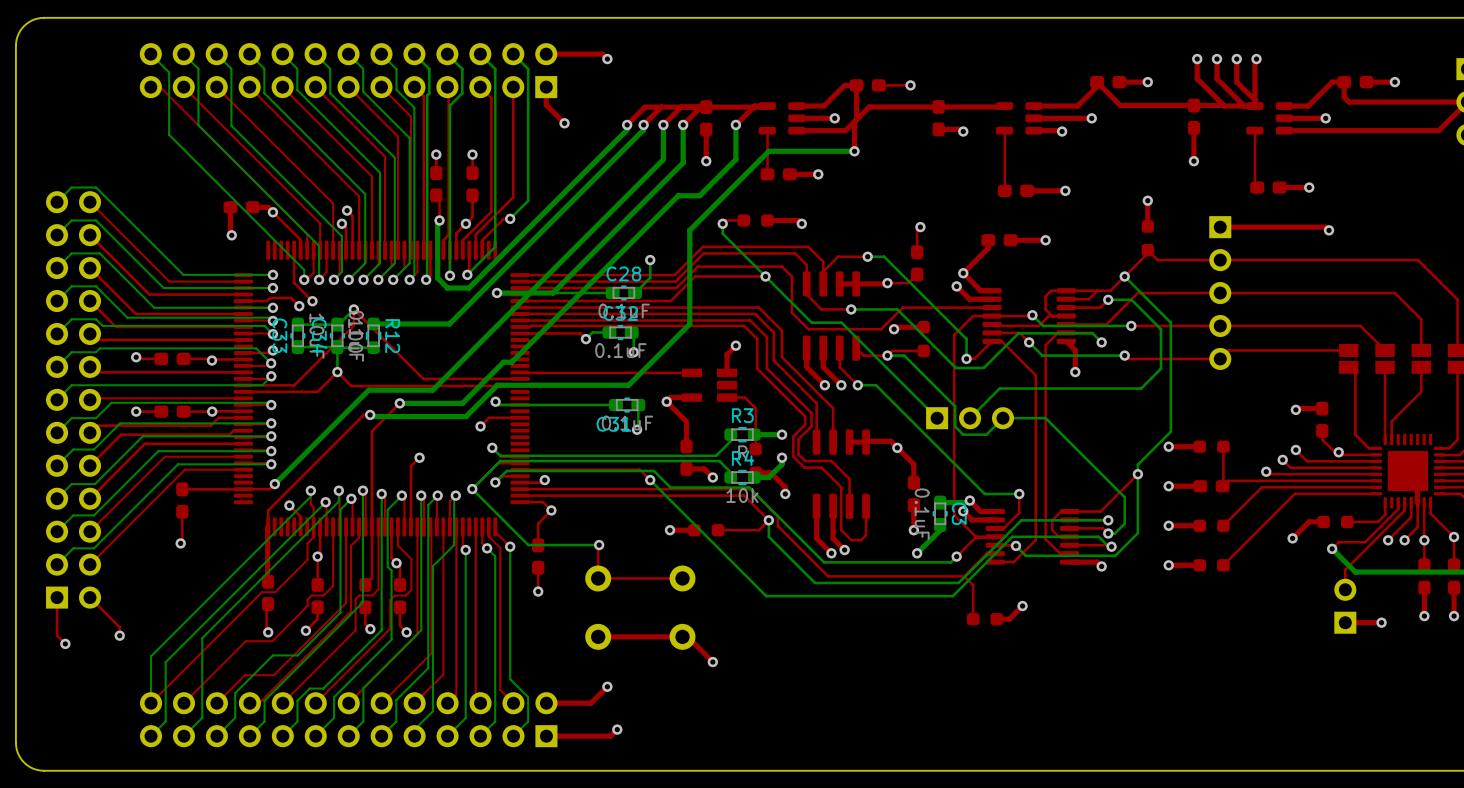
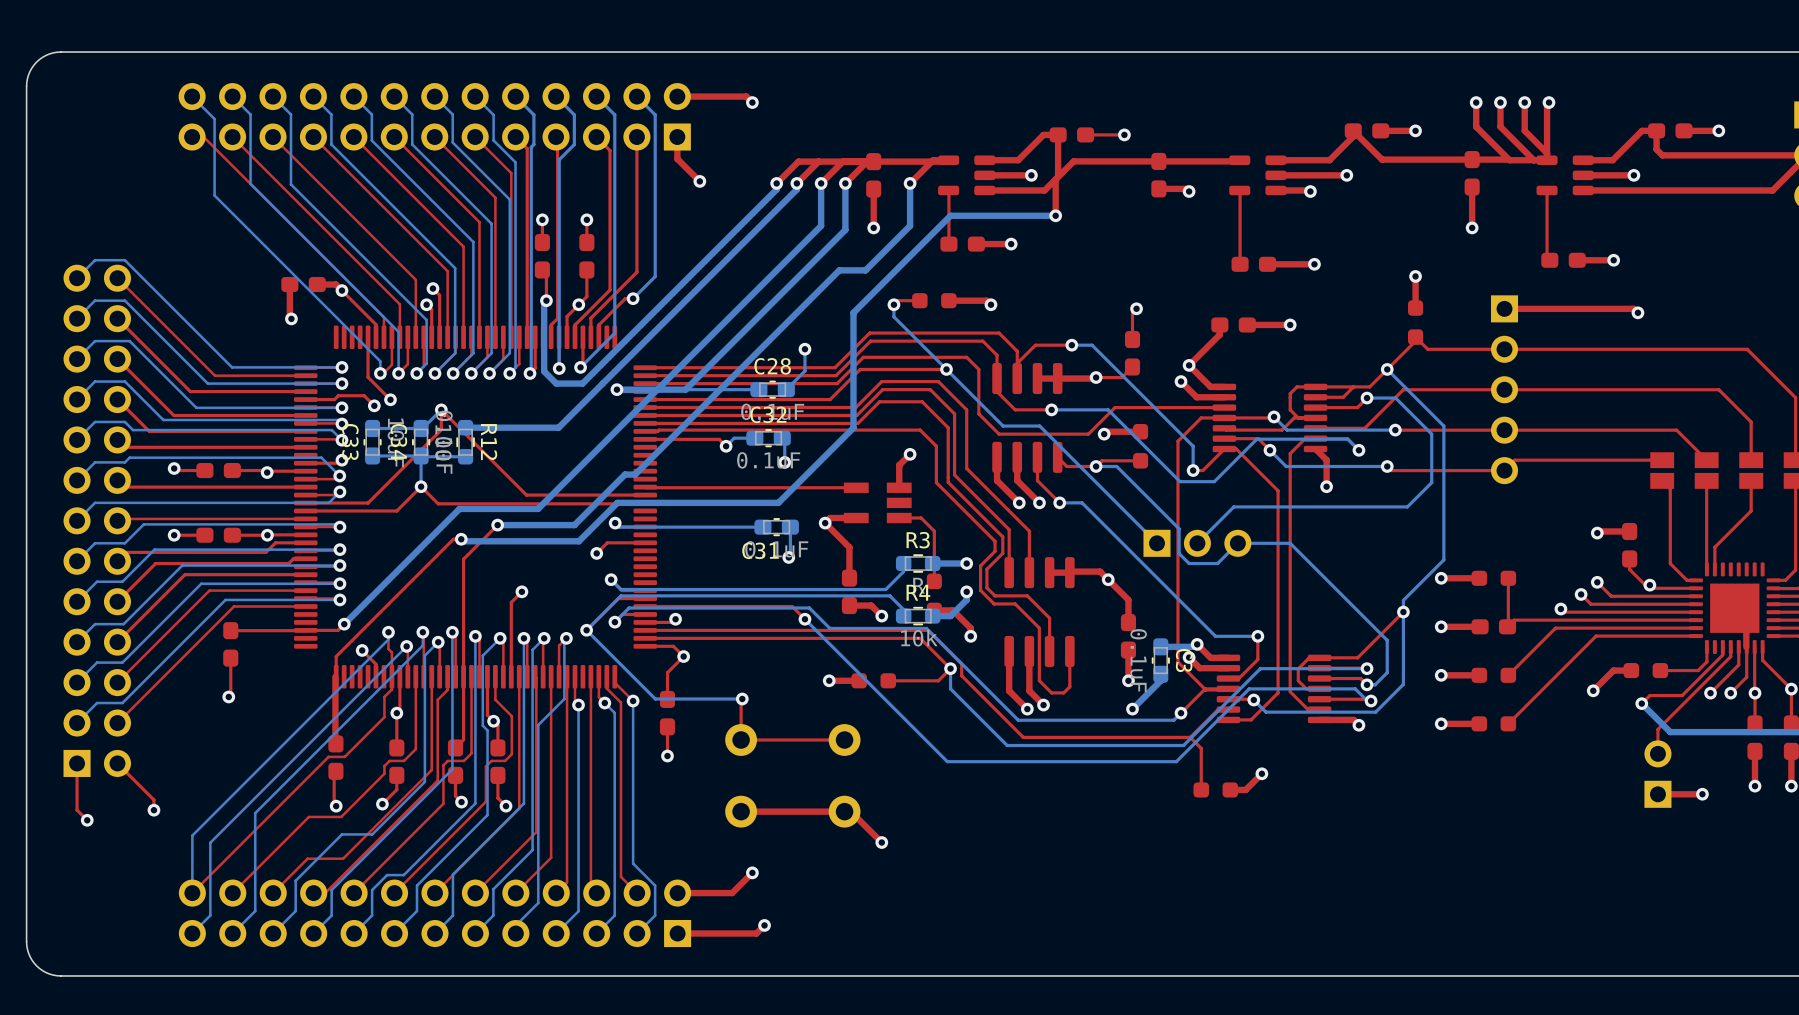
top track: (691, 307) (758, 307) (782, 330) -> (855, 407) (881, 381) (938, 381) (966, 409) (966, 436)
top track: (692, 314) (755, 314) (773, 332) (773, 360) (816, 403) (816, 407) -> (856, 415) (882, 389) (930, 389) (954, 413) (954, 475) (1009, 529)
top track: (693, 320) (750, 320) (766, 337) -> (857, 423) (879, 401) (922, 401) (948, 427) (948, 443)

